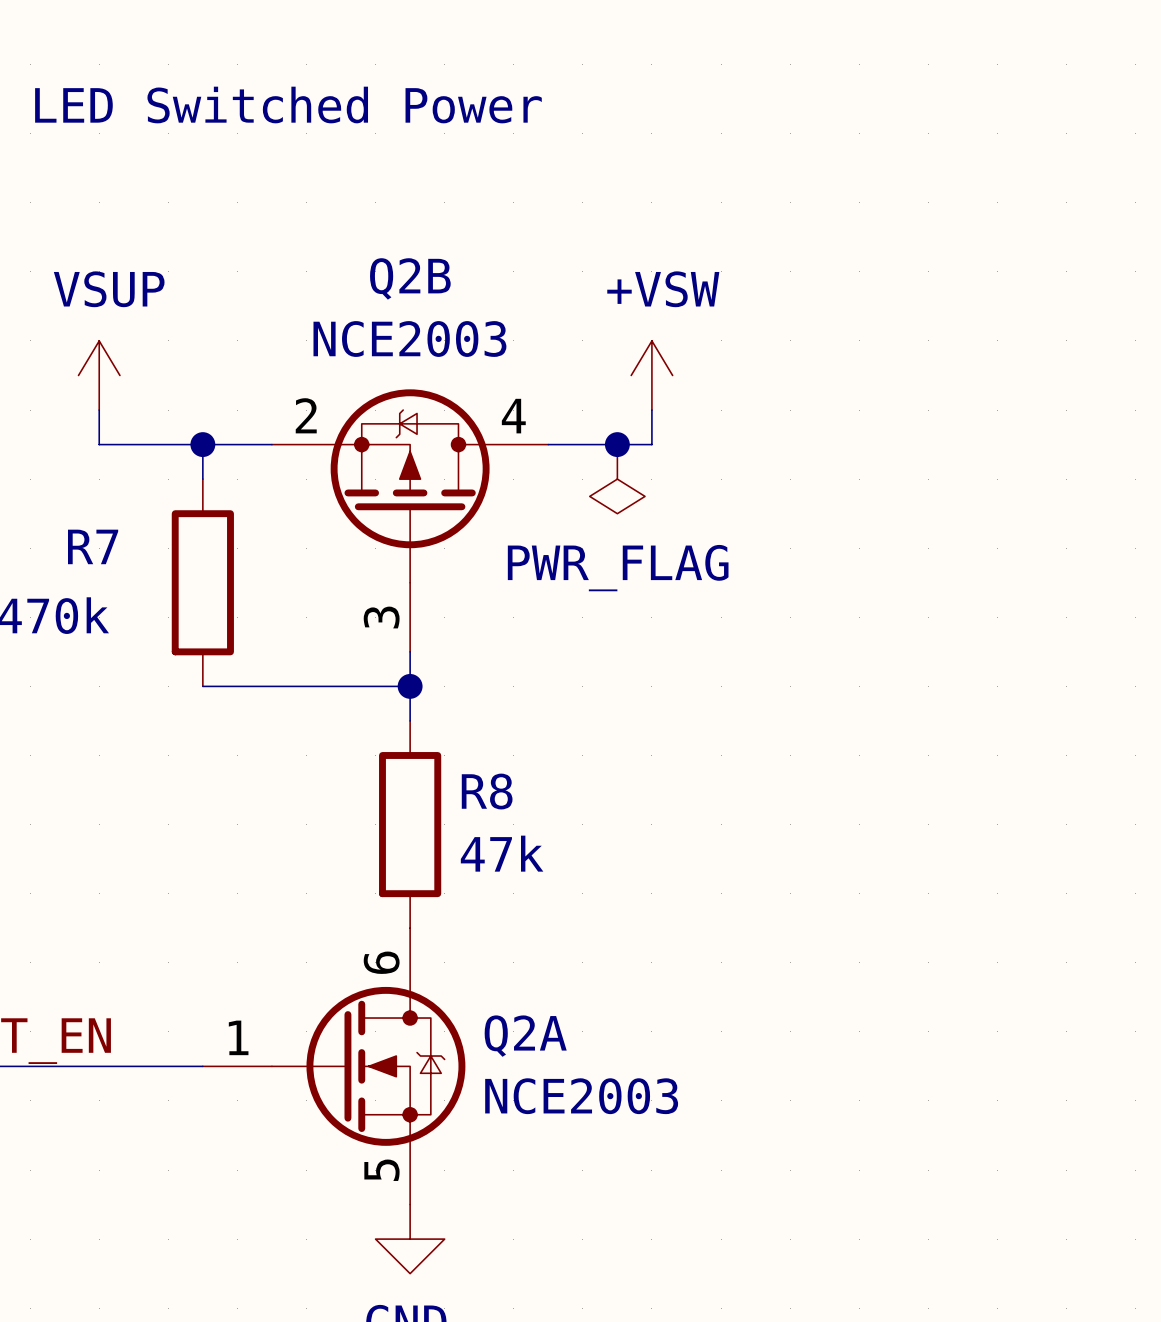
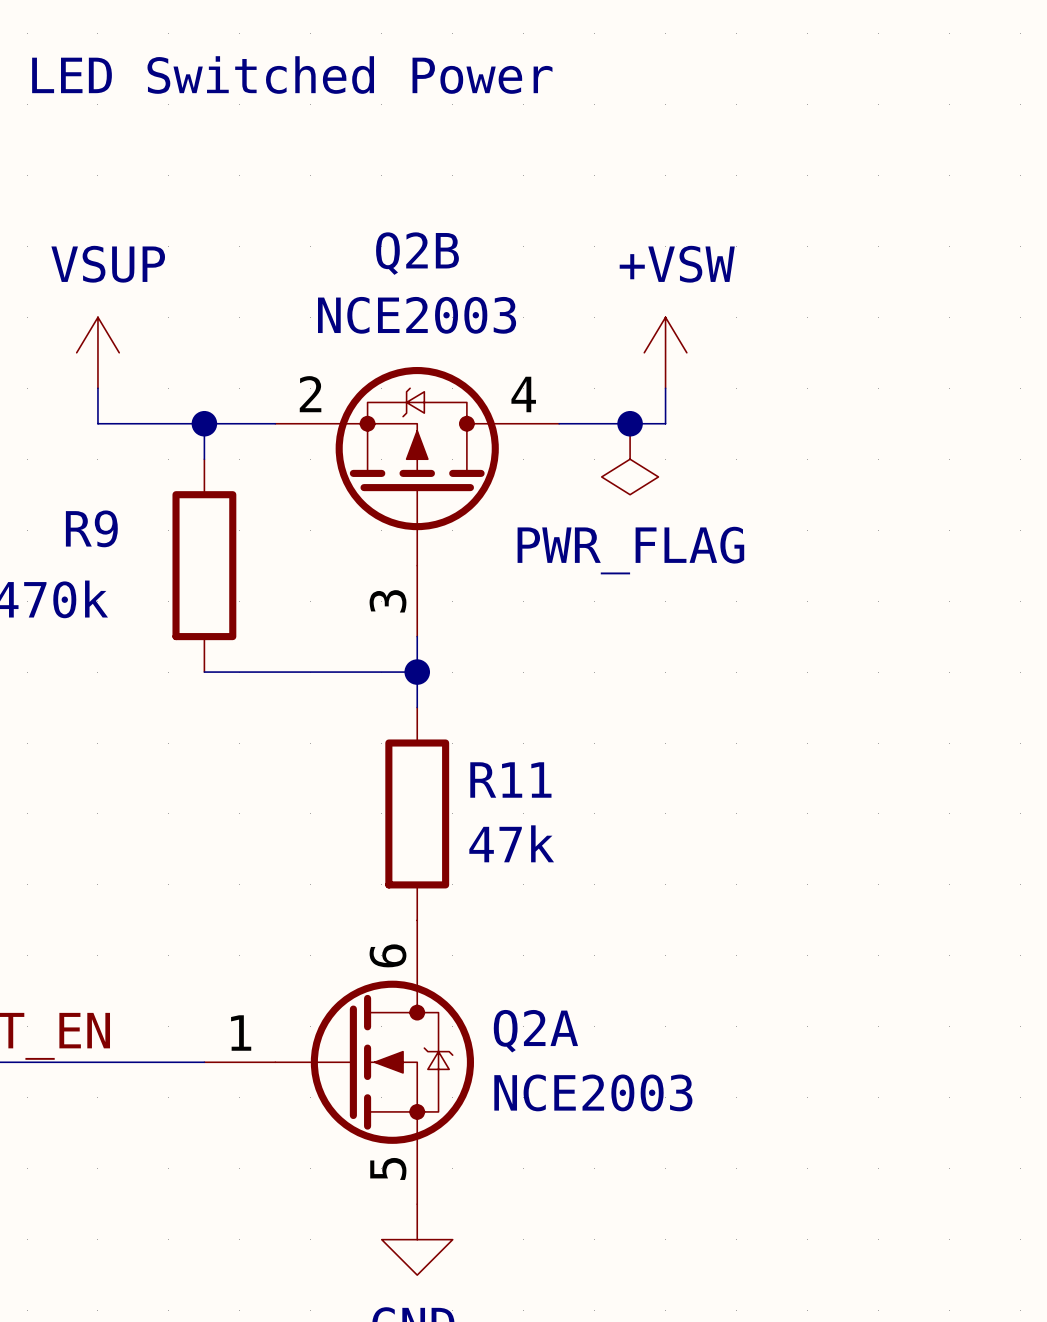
R7 name: R7 (93, 546) -> R9 (91, 528)
R8 name: R8 (487, 791) -> R11 (510, 780)

